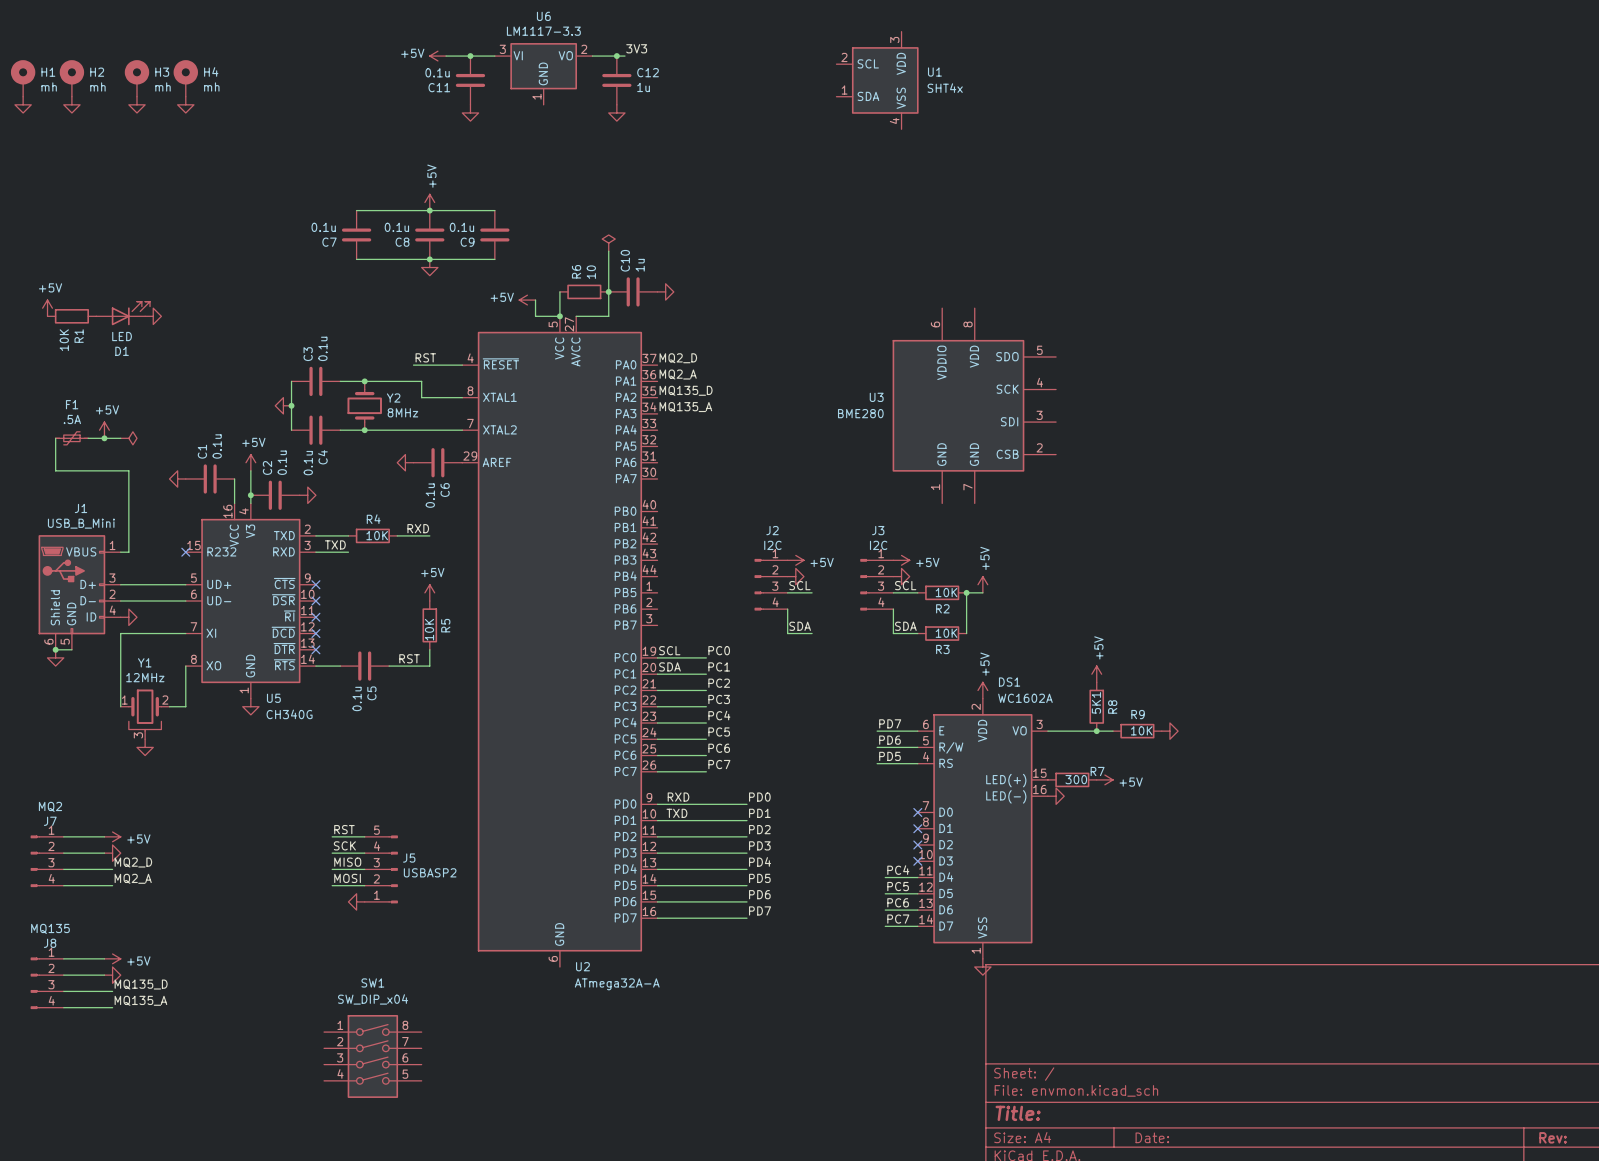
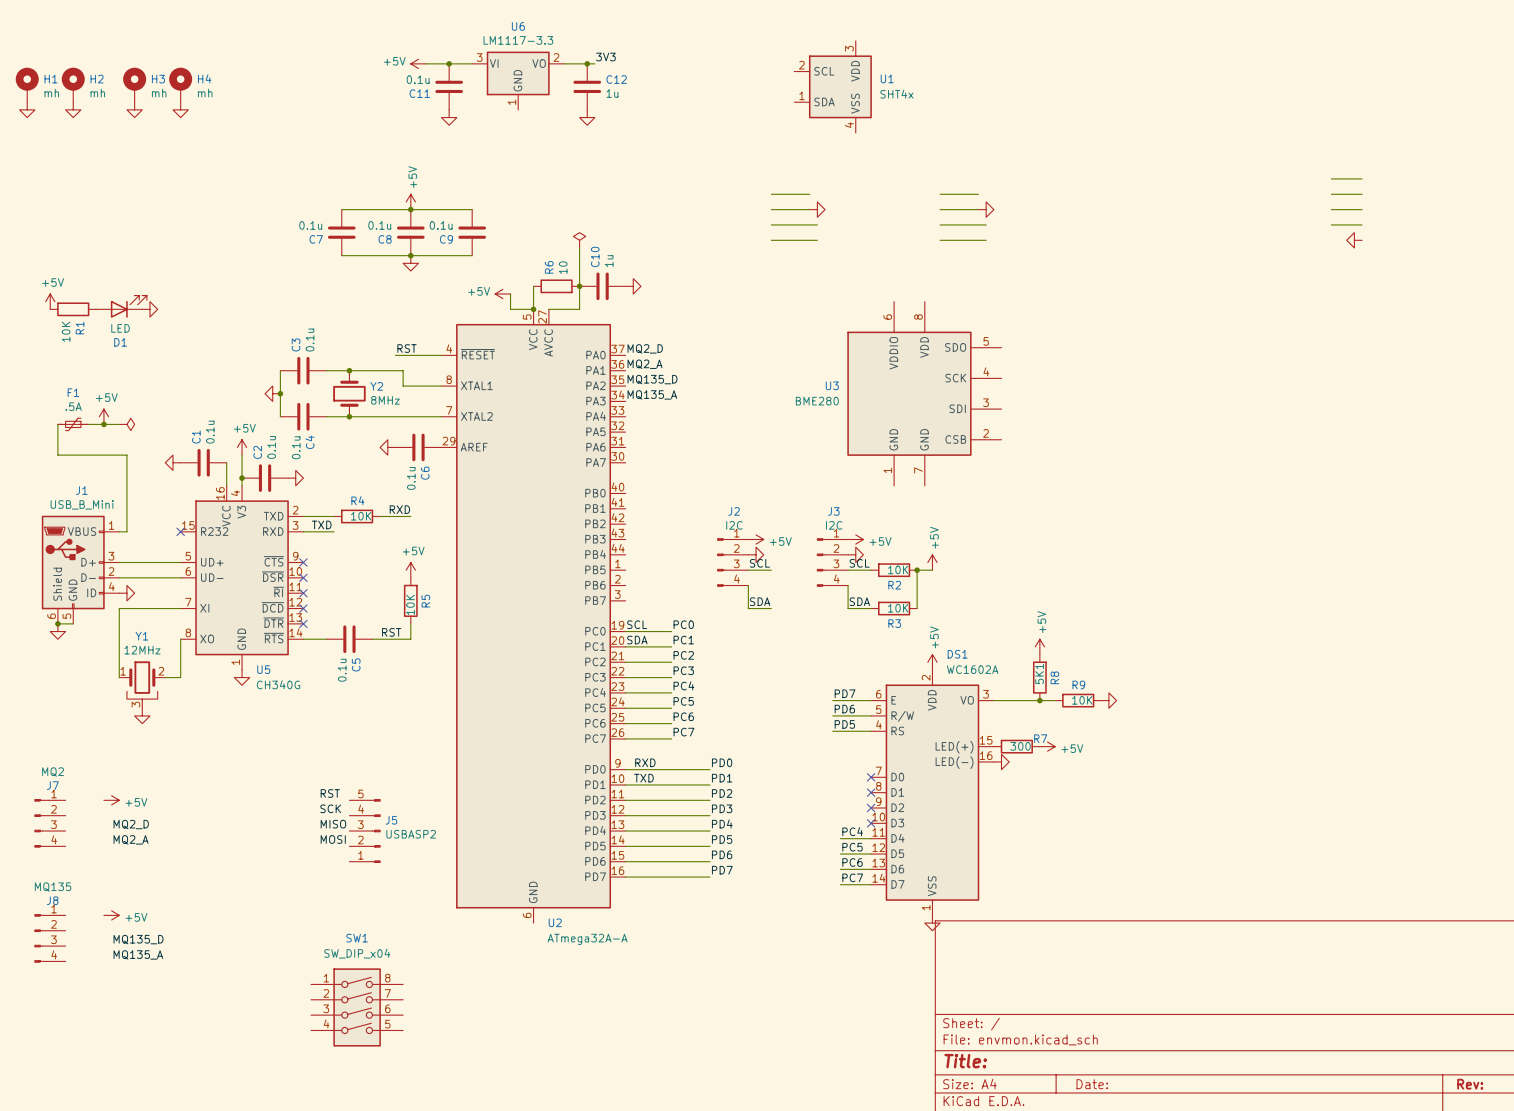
wire: none -> (1331, 178) (1362, 178)
wire: none -> (771, 194) (809, 194)
wire: none -> (940, 194) (978, 194)
wire: none -> (1331, 194) (1362, 194)
wire: none -> (771, 209) (809, 209)
power symbol: none -> (817, 209)
wire: none -> (940, 209) (978, 209)
power symbol: none -> (986, 209)
wire: none -> (1331, 209) (1362, 209)
wire: none -> (771, 224) (817, 224)
wire: none -> (940, 224) (986, 224)
wire: none -> (1331, 224) (1362, 224)
wire: none -> (771, 240) (817, 240)
wire: none -> (940, 240) (986, 240)
power symbol: none -> (1354, 240)
wire: (63, 836) (104, 836) -> none
wire: (332, 836) (364, 836) -> none
wire: (63, 853) (104, 853) -> none
power symbol: (112, 853) -> none
wire: (332, 853) (364, 853) -> none
wire: (63, 869) (112, 869) -> none
wire: (332, 869) (364, 869) -> none
wire: (63, 885) (112, 885) -> none
wire: (332, 885) (364, 885) -> none
power symbol: (356, 901) -> none
wire: (63, 958) (104, 958) -> none
wire: (63, 975) (104, 975) -> none
power symbol: (112, 975) -> none
wire: (63, 991) (112, 991) -> none
wire: (63, 1007) (112, 1007) -> none

